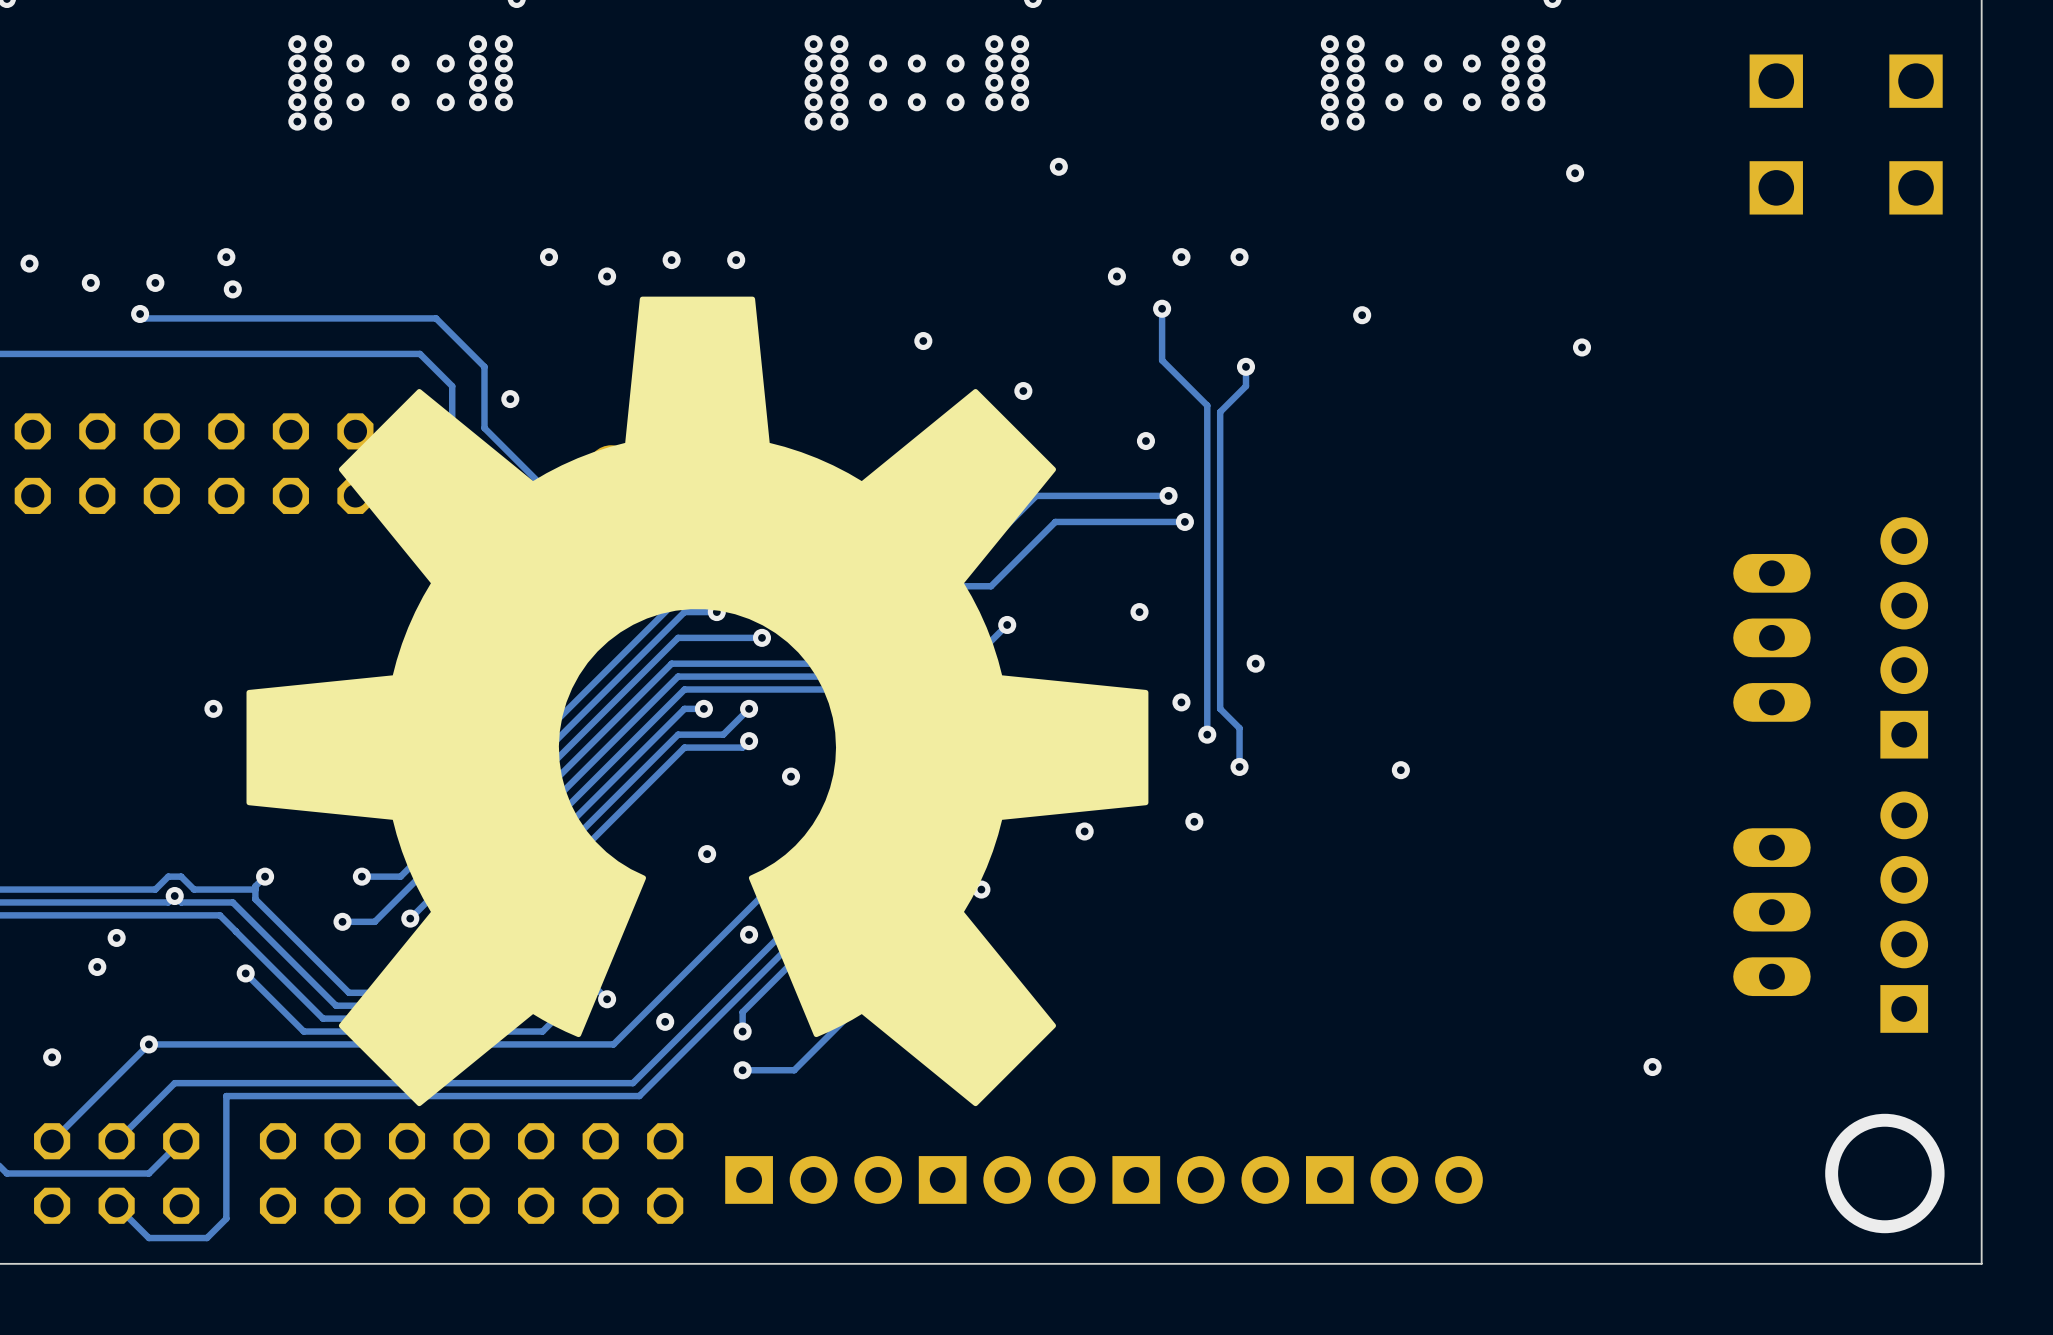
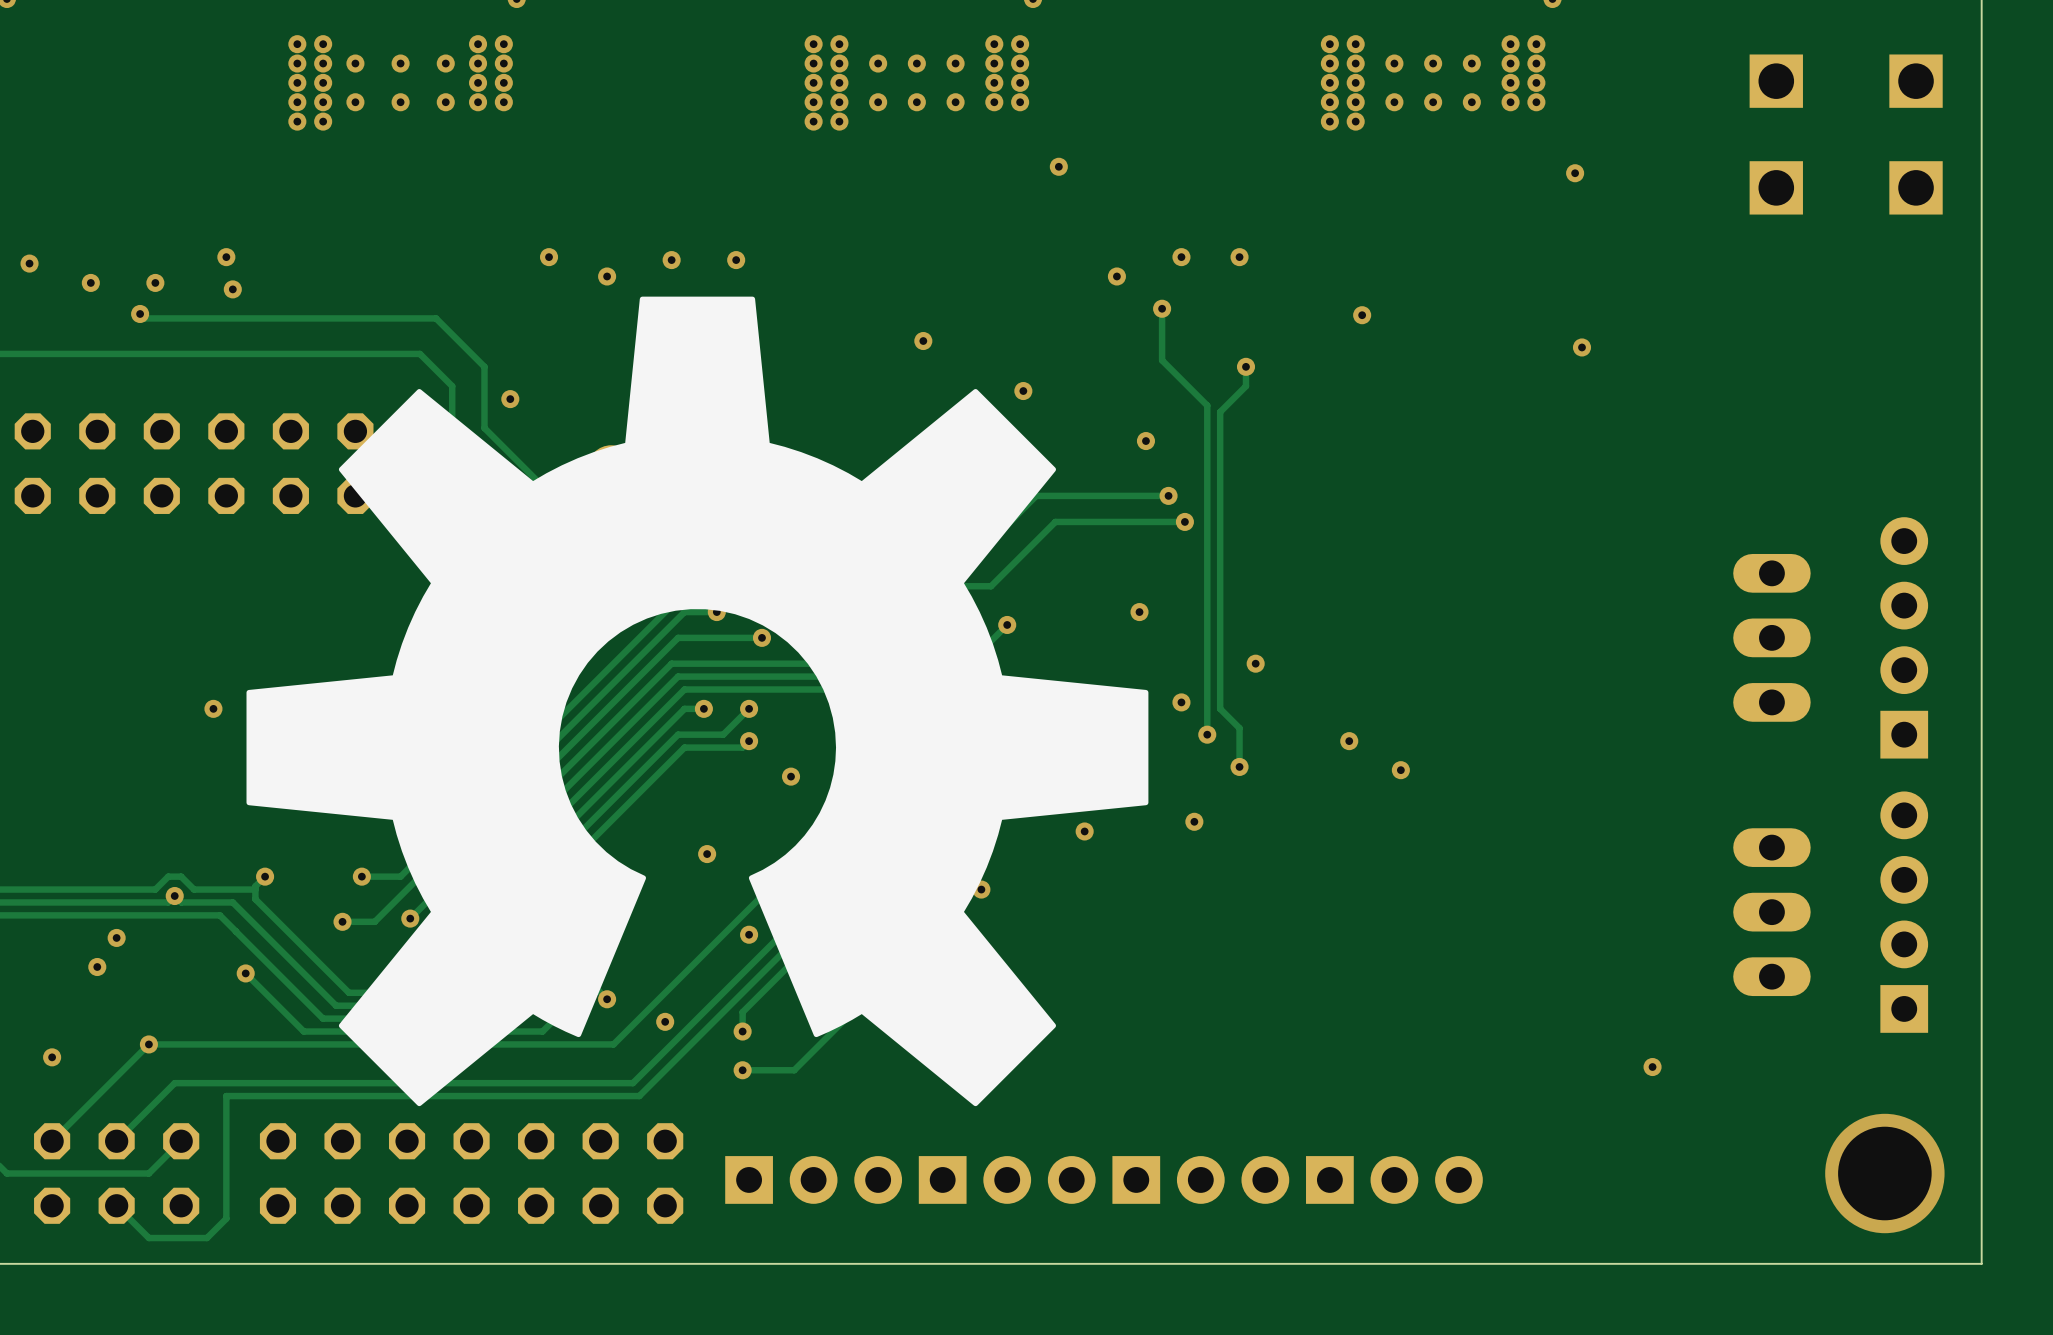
via: none -> (1349, 741)

